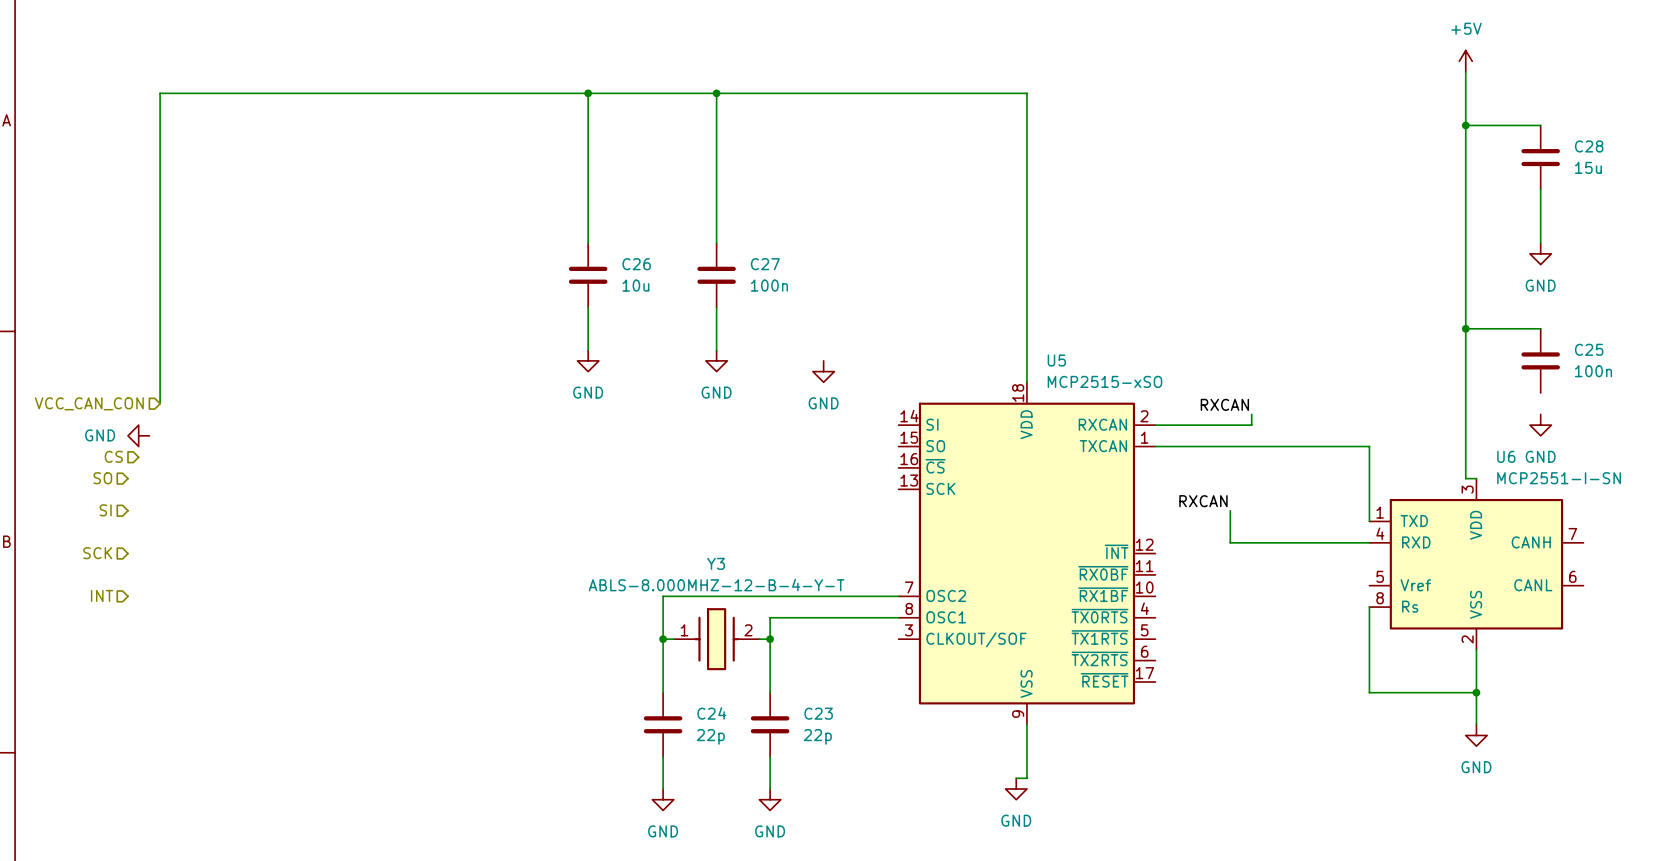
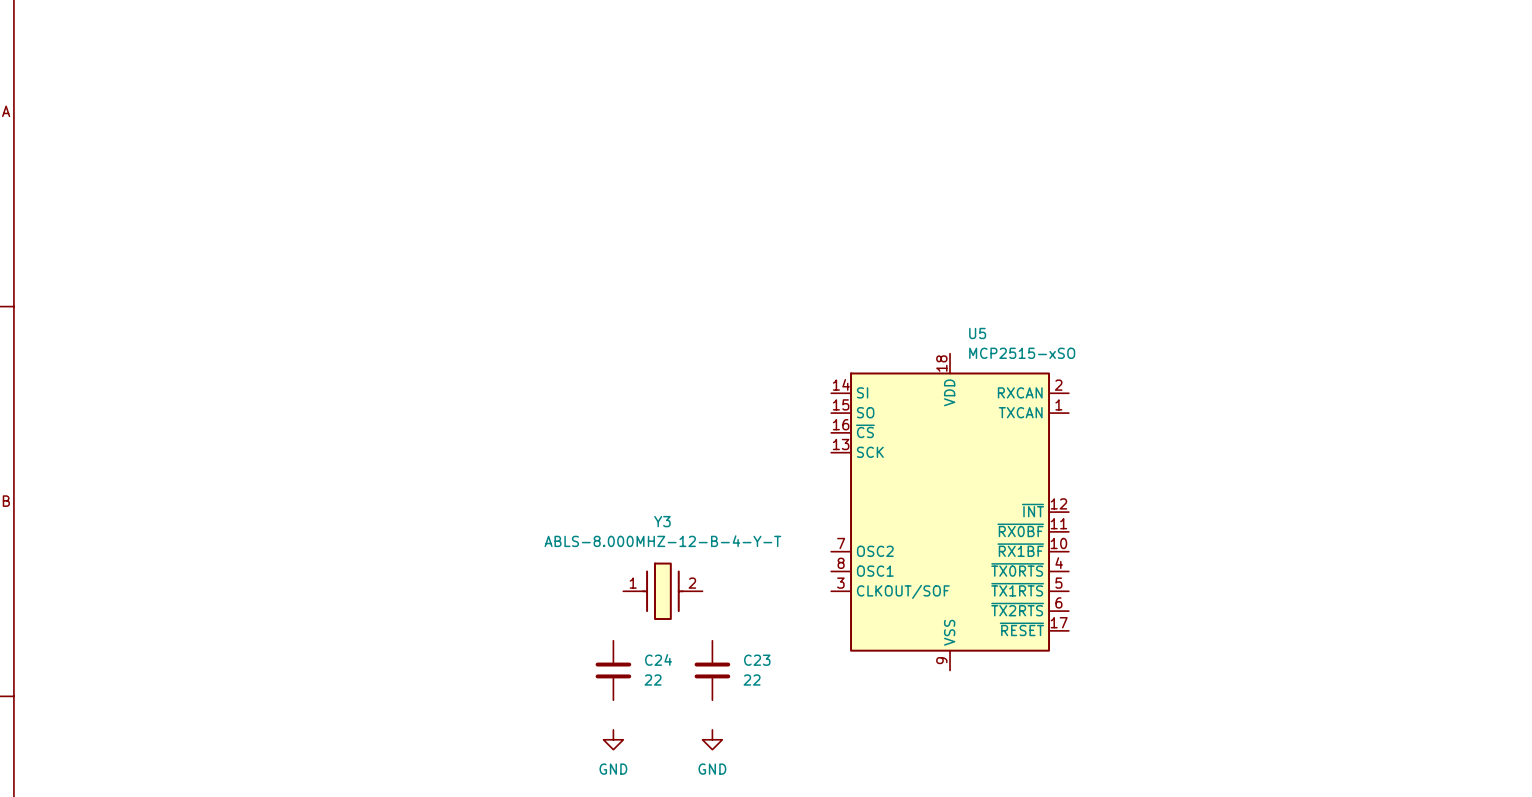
power symbol: +5V (1465, 61) -> none
wire: (1465, 71) (1465, 478) (1476, 478) -> none
wire: (588, 93) (588, 243) -> none
junction: (588, 93) -> none
wire: (716, 93) (716, 243) -> none
junction: (716, 93) -> none
wire: (1465, 125) (1540, 125) -> none
junction: (1465, 125) -> none
C28: 15u (1540, 157) -> none
wire: (1540, 189) (1540, 243) -> none
power symbol: GND (1540, 253) -> none
C26: 10u (588, 275) -> none
C27: 100n (716, 275) -> none
wire: (588, 307) (588, 350) -> none
wire: (716, 307) (716, 350) -> none
wire: (1465, 328) (1540, 328) -> none
junction: (1465, 328) -> none
power symbol: GND (588, 360) -> none
power symbol: GND (716, 360) -> none
C25: 100n (1540, 360) -> none
power symbol: GND (823, 371) -> none
wire: (1026, 382) (1026, 93) (160, 93) (160, 403) -> none
hierarchical label: VCC_CAN_CON (89, 403) -> none
label: RXCAN (1224, 404) -> none
wire: (1251, 414) (1251, 425) (1155, 425) -> none
power symbol: GND (1540, 425) -> none
power symbol: GND (138, 435) -> none
wire: (1155, 446) (1369, 446) (1369, 521) -> none
hierarchical label: CS (113, 456) -> none
hierarchical label: SO (102, 478) -> none
label: RXCAN (1203, 501) -> none
hierarchical label: SI (105, 510) -> none
wire: (1230, 510) (1230, 542) (1369, 542) -> none
hierarchical label: SCK (97, 553) -> none
U6: MCP2551-I-SN (1476, 564) -> none
hierarchical label: INT (102, 595) -> none
wire: (898, 596) (663, 596) (663, 692) -> none
wire: (1369, 607) (1369, 692) (1476, 692) -> none
wire: (898, 617) (770, 617) (770, 692) -> none
wire: (663, 639) (673, 639) -> none
junction: (663, 639) -> none
wire: (759, 639) (770, 639) -> none
junction: (770, 639) -> none
wire: (1476, 649) (1476, 724) -> none
junction: (1476, 692) -> none
wire: (1026, 724) (1026, 778) (1016, 778) -> none
power symbol: GND (1476, 735) -> none
C24 value: 22p (710, 736) -> 22 (653, 680)
C23 value: 22p (817, 736) -> 22 (752, 680)
wire: (663, 756) (663, 789) -> none
wire: (770, 756) (770, 789) -> none
power symbol: GND (1016, 789) -> none

